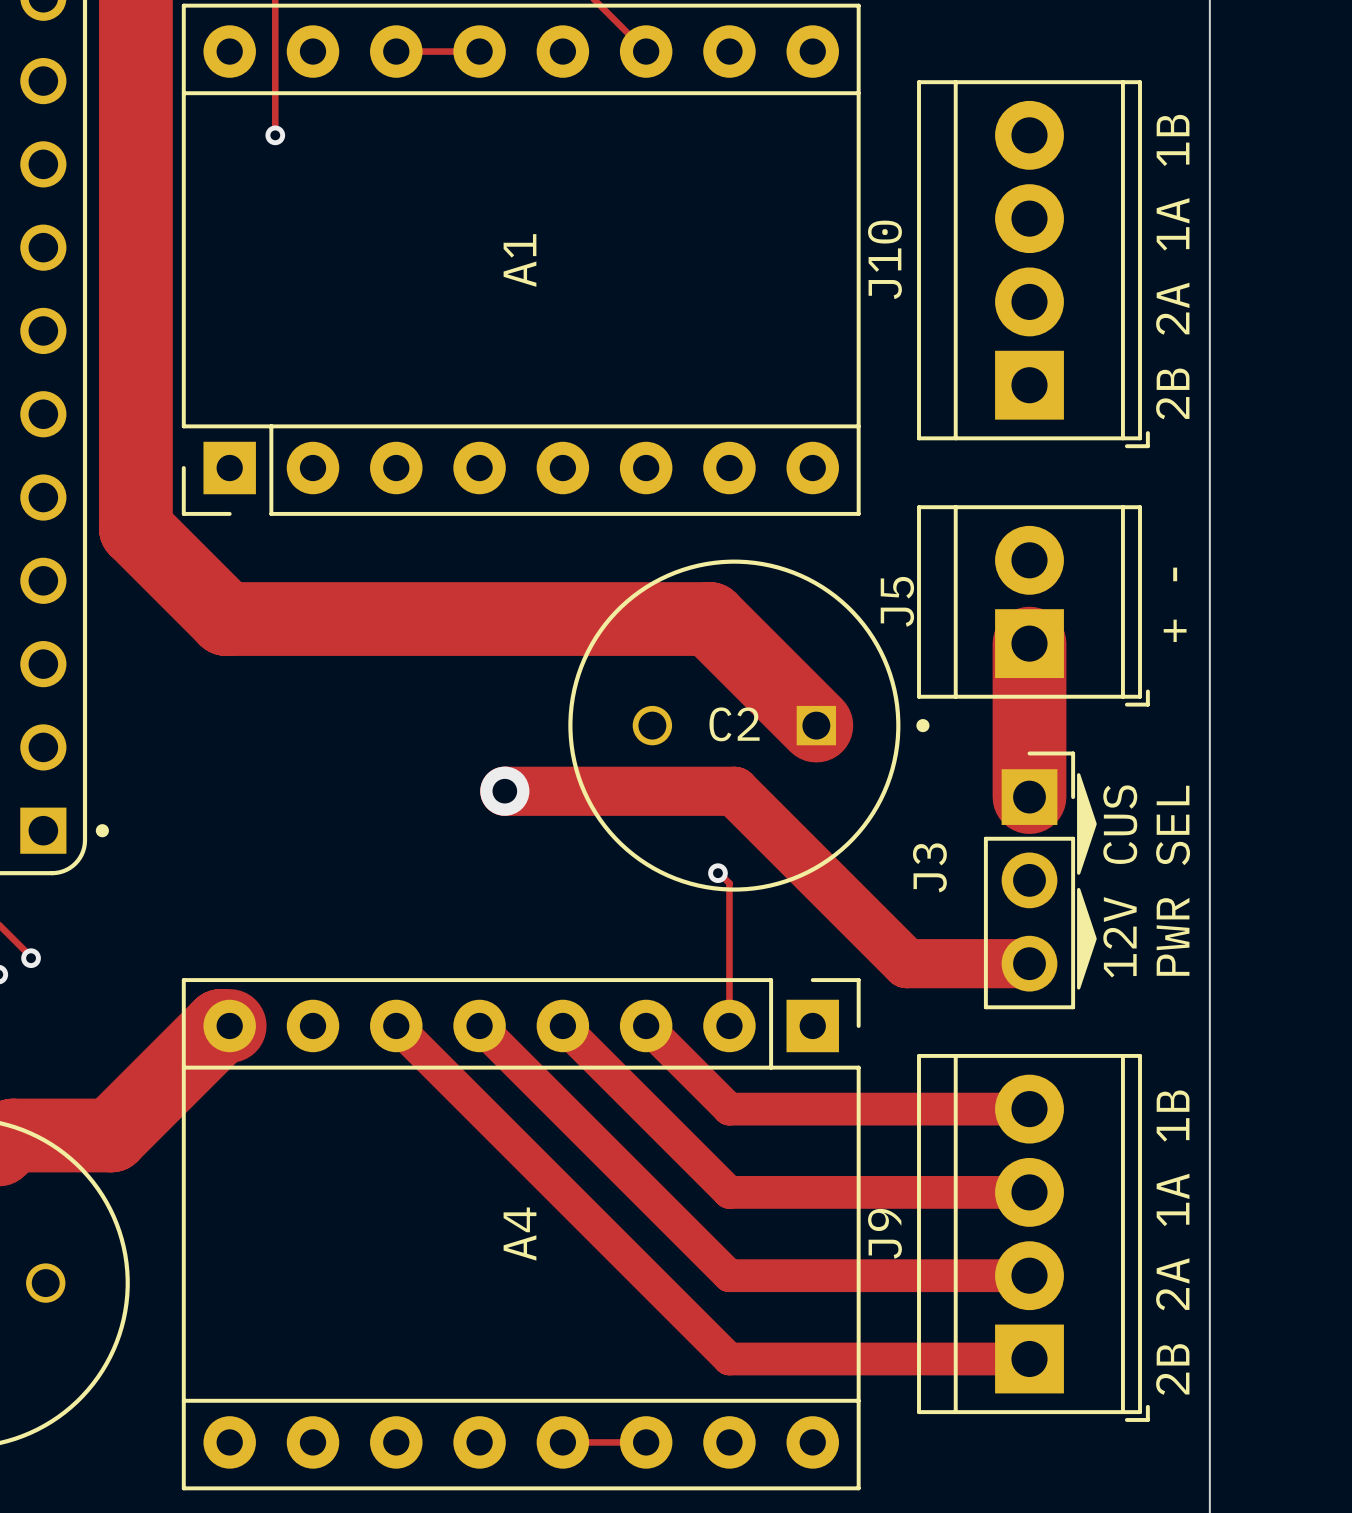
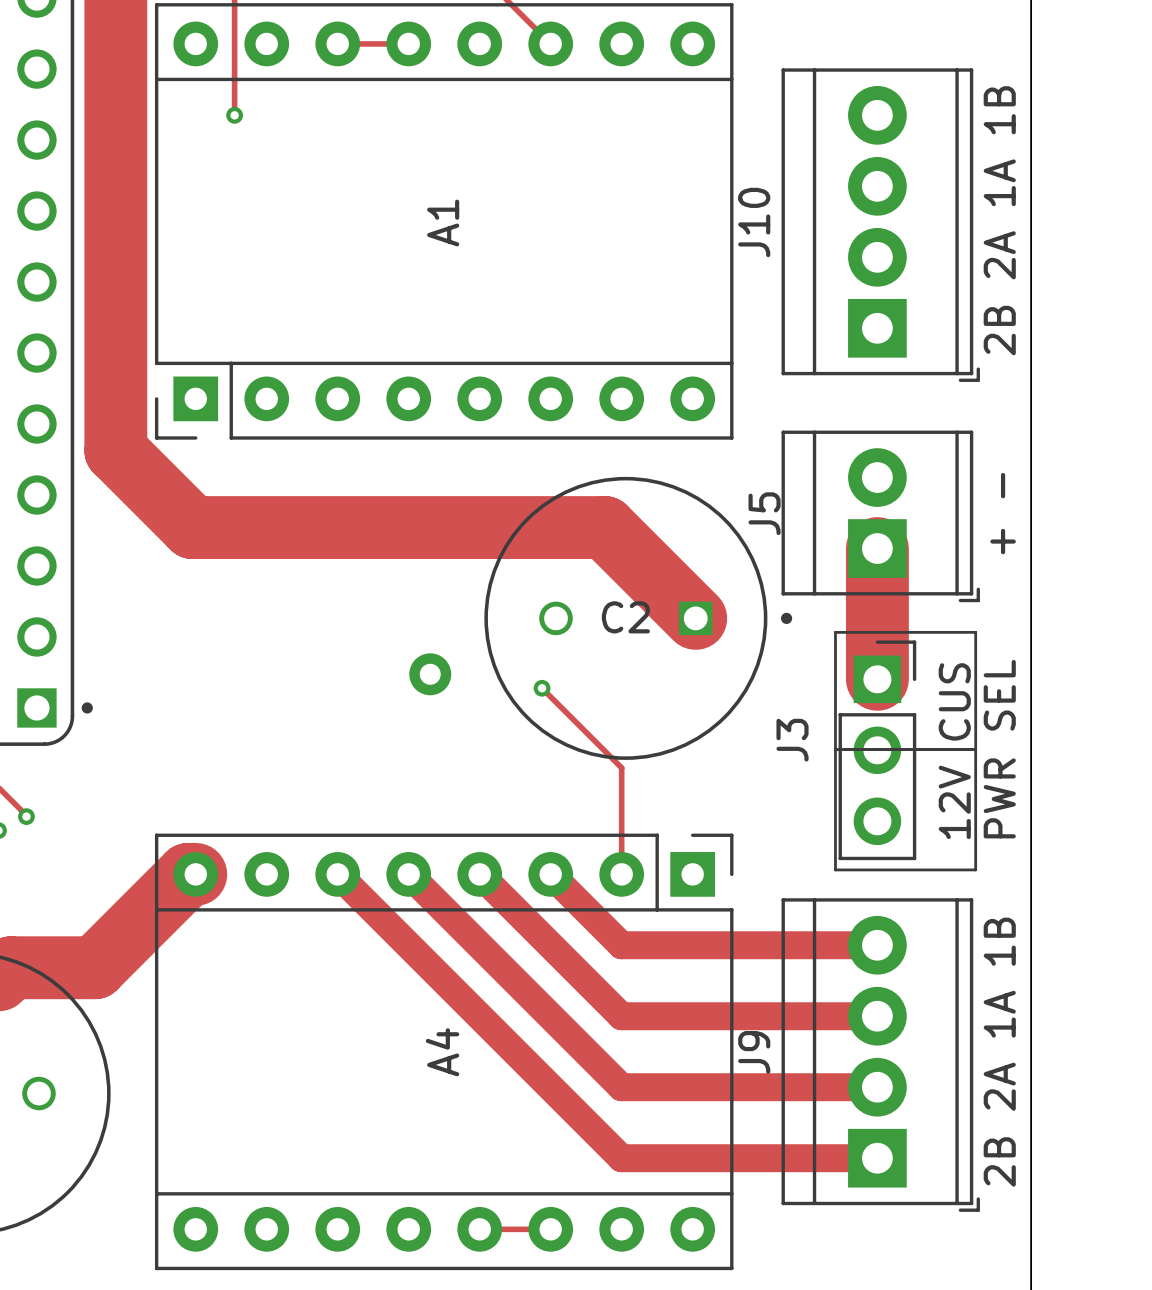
line: none -> (835, 632) (975, 632) (975, 869) (835, 869) (835, 632)
drawing: [1077, 773, 1097, 990] -> none
track: (504, 791) (734, 791) (906, 963) (1029, 963) -> none
track: (717, 873) (729, 883) (729, 901) -> (542, 688) (621, 767)
via position: (717, 873) -> (542, 688)
line: none -> (835, 749) (975, 749)

